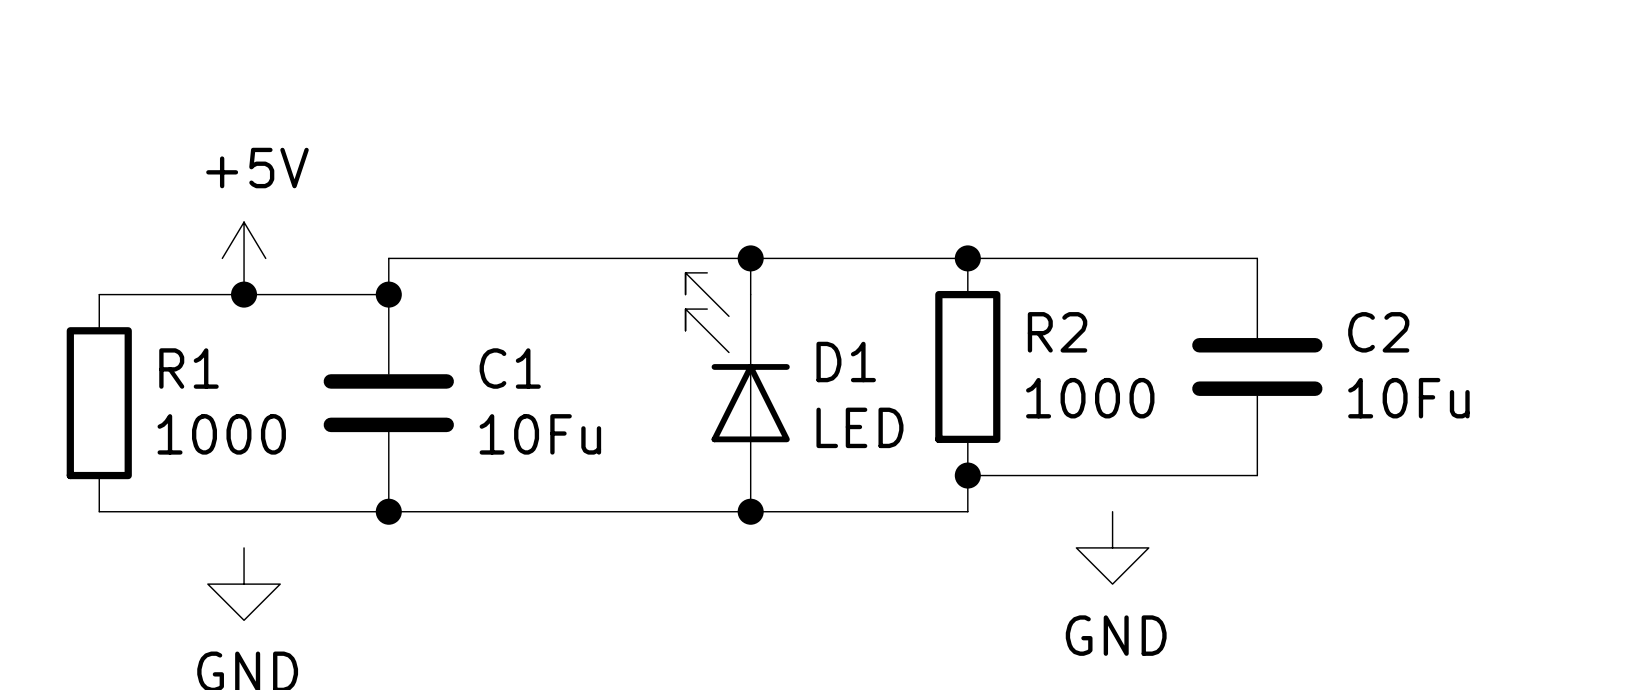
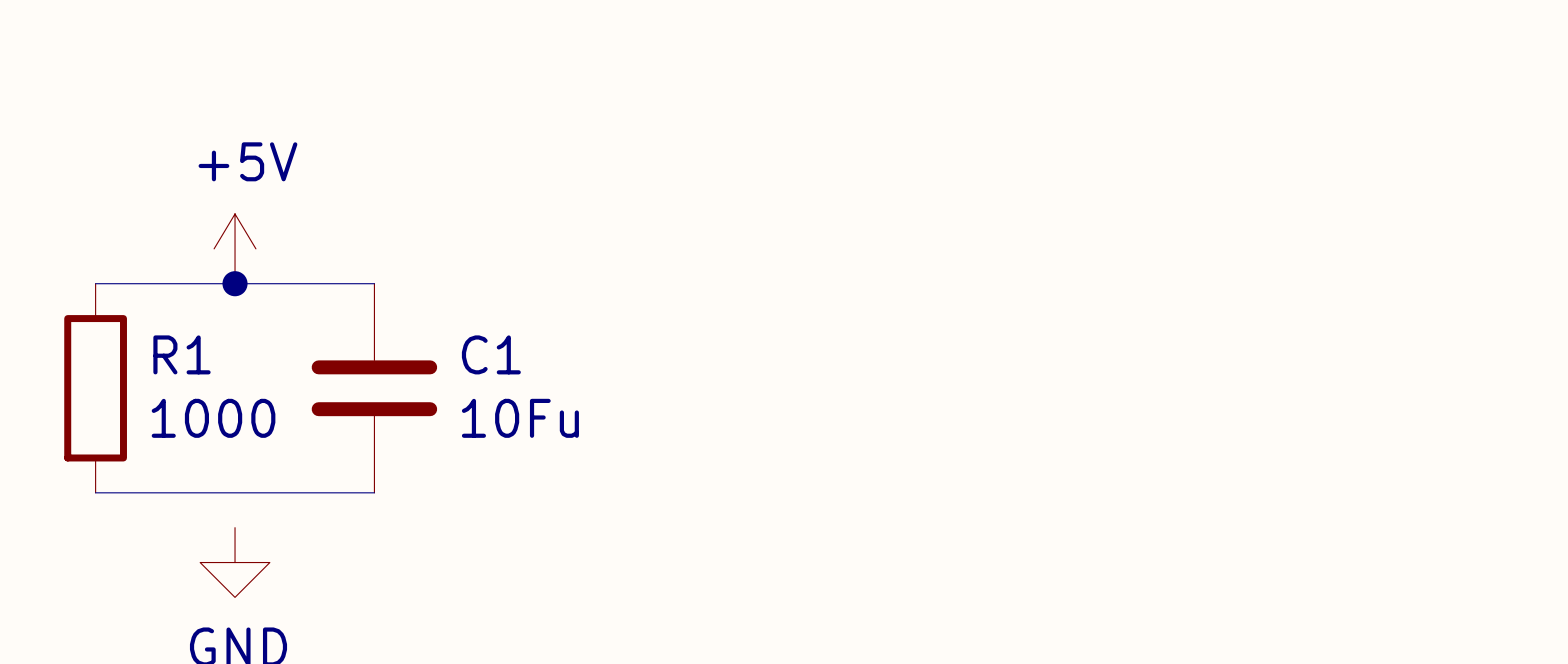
wire: (750, 258) (750, 294) -> none
junction: (750, 258) -> none
junction: (967, 258) -> none
wire: (1257, 258) (388, 258) (388, 294) -> none
junction: (388, 294) -> none
R2: 1000 (967, 366) -> none
C2: 10Fu (1257, 366) -> none
D1: LED (737, 392) -> none
junction: (967, 475) -> none
wire: (1257, 475) (967, 475) (967, 511) (388, 511) -> none
junction: (388, 511) -> none
junction: (750, 511) -> none
power symbol: GND (1112, 547) -> none

